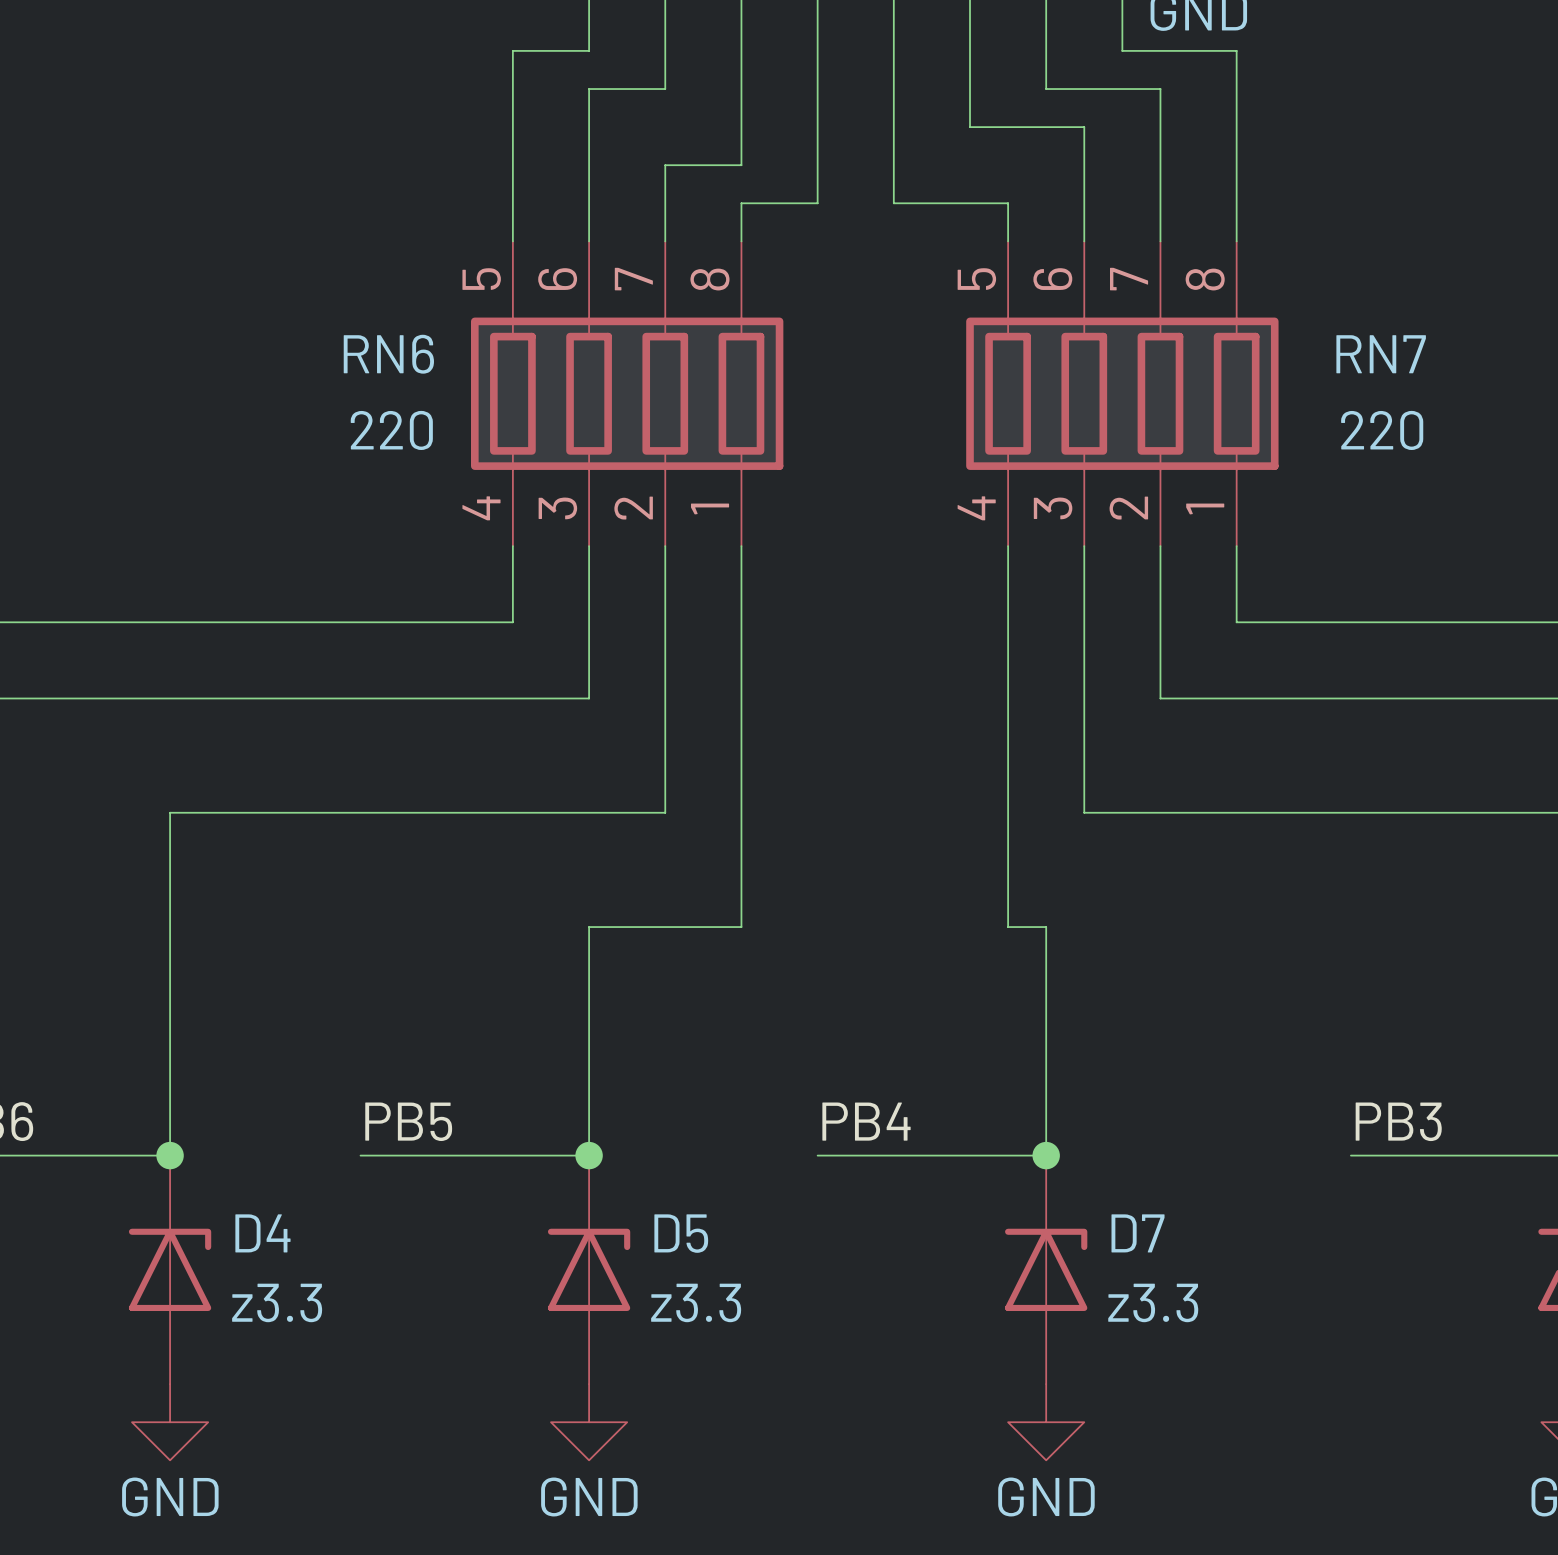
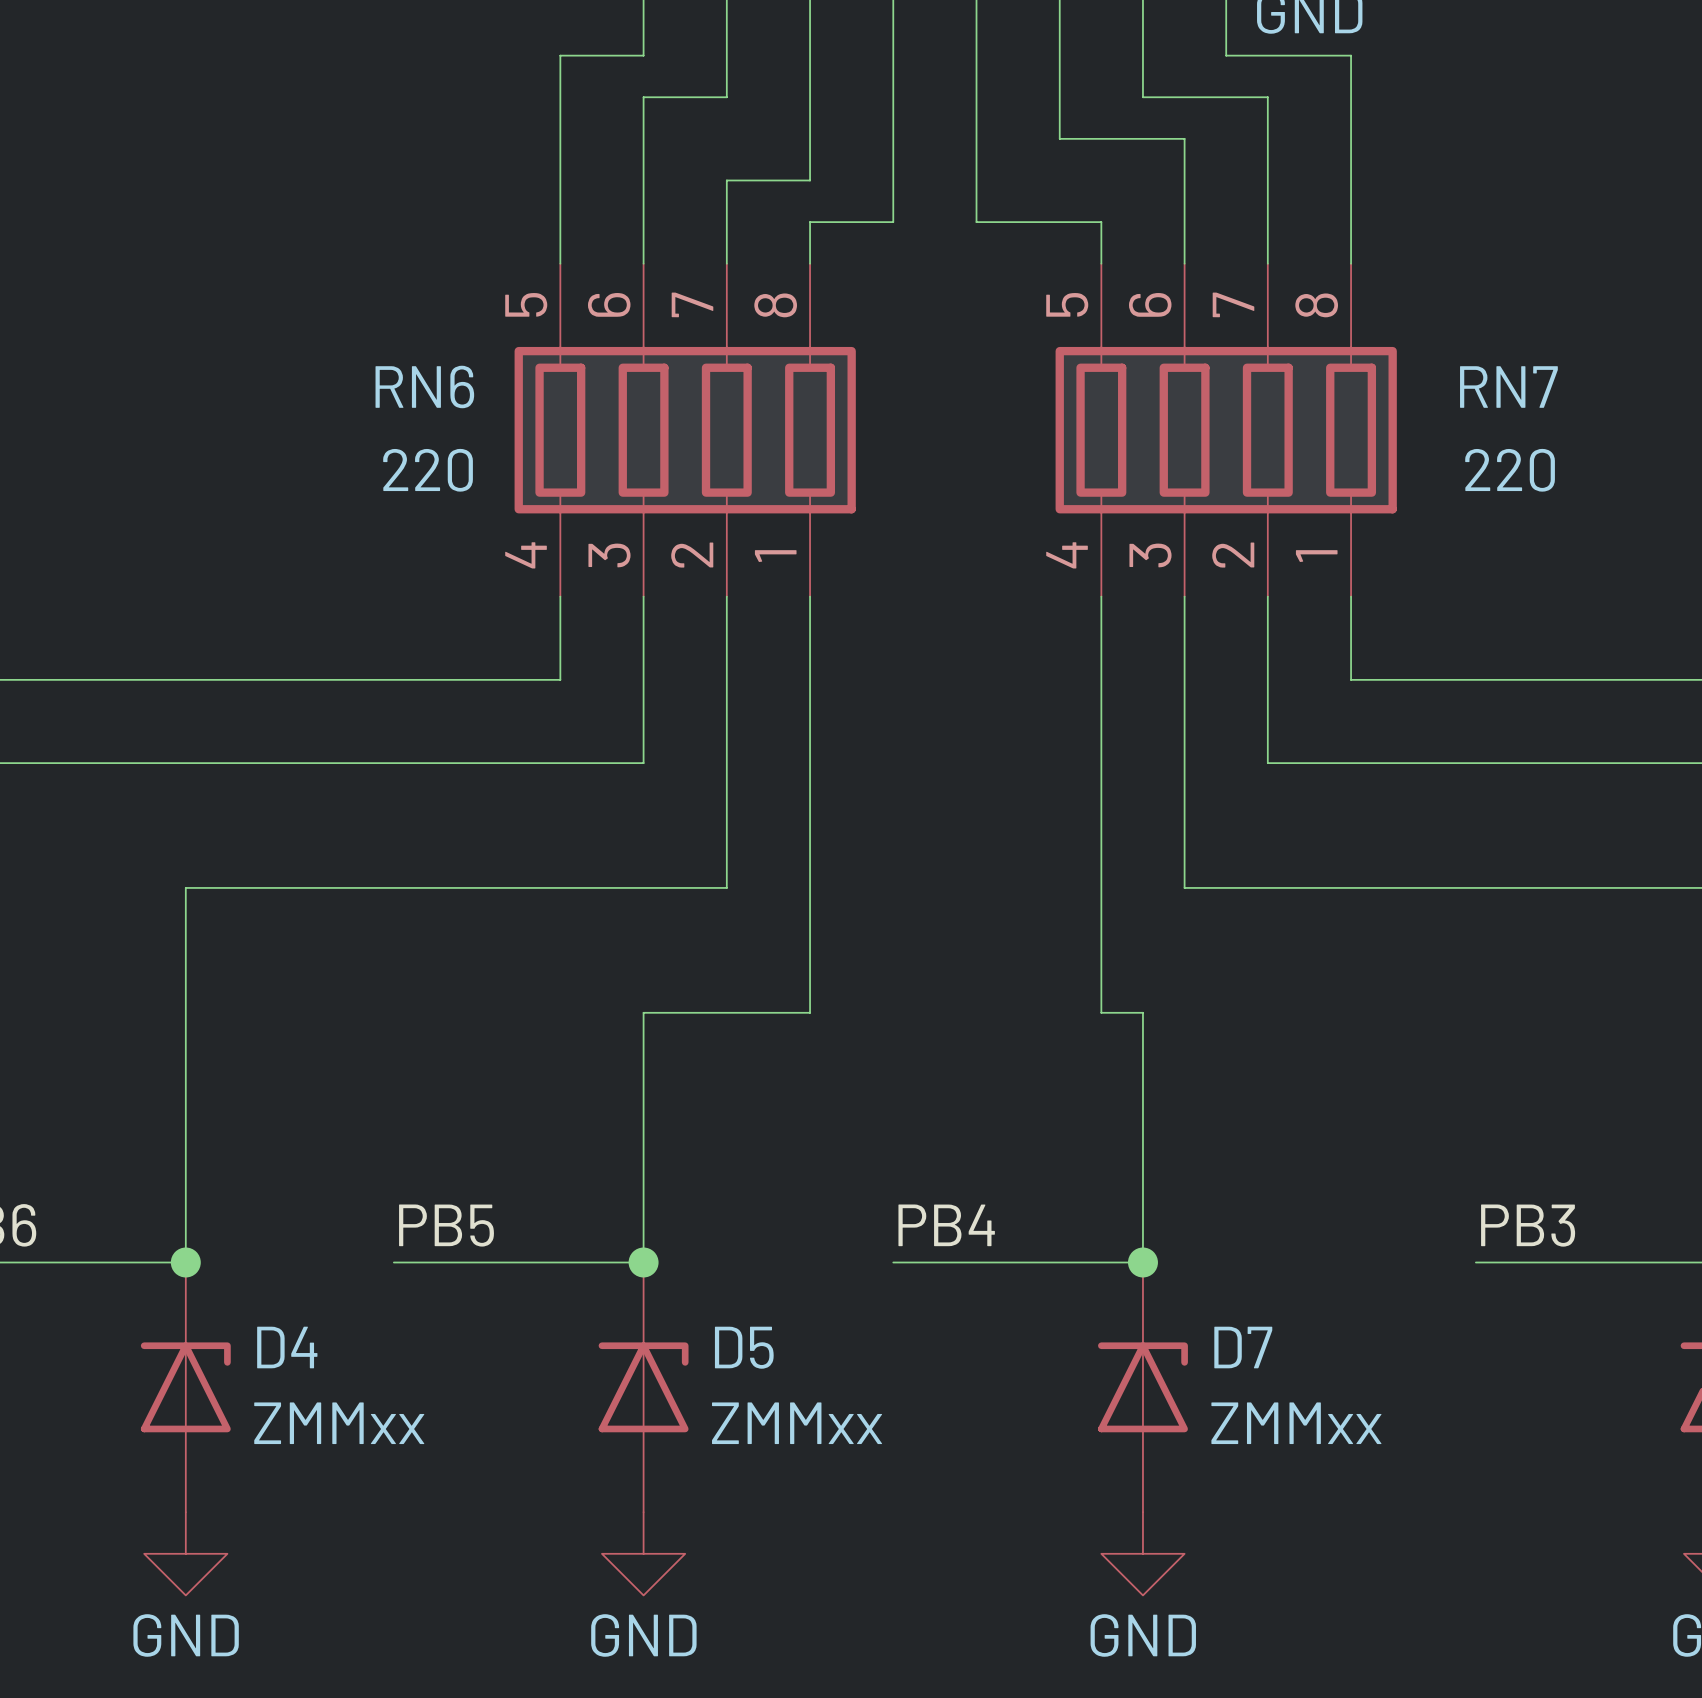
D4 value: z3.3 (277, 1302) -> ZMMxx (339, 1423)
D5 value: z3.3 (696, 1302) -> ZMMxx (797, 1423)
D7 value: z3.3 (1153, 1302) -> ZMMxx (1296, 1423)

